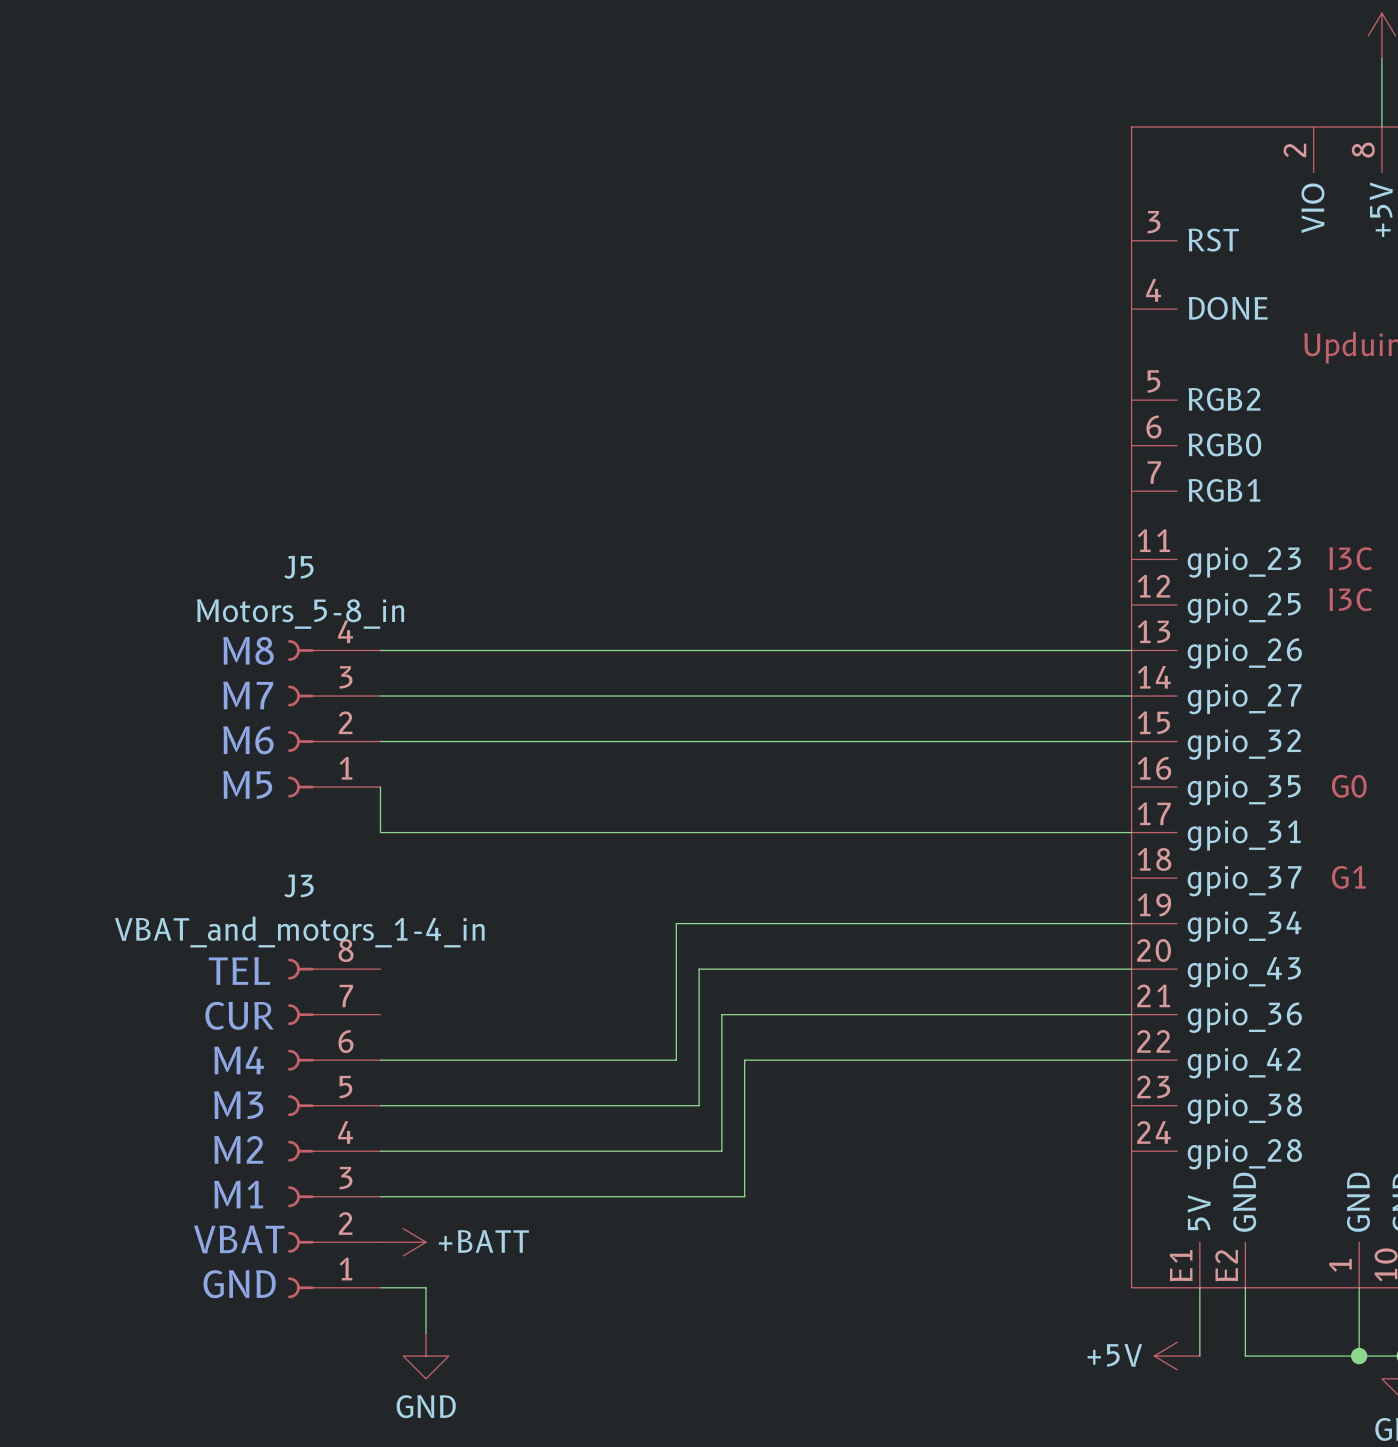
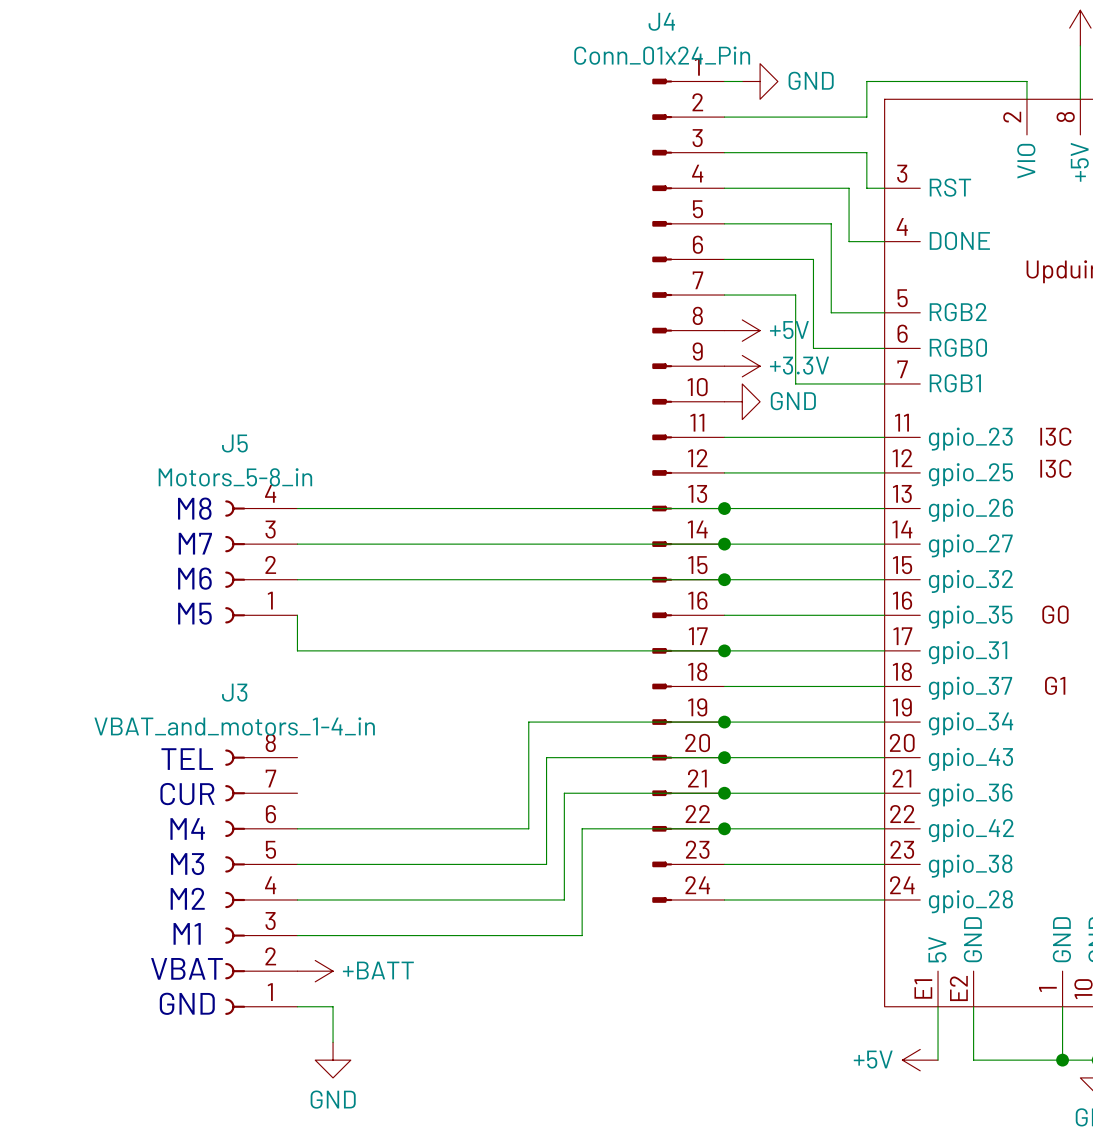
wire: none -> (724, 81) (742, 81)
power symbol: none -> GND (760, 81)
wire: none -> (1026, 99) (1026, 81) (866, 81) (866, 117) (724, 117)
wire: none -> (724, 152) (866, 152) (866, 188) (884, 188)
wire: none -> (724, 188) (849, 188) (849, 241) (884, 241)
wire: none -> (724, 223) (831, 223) (831, 312) (884, 312)
wire: none -> (724, 259) (813, 259) (813, 348) (884, 348)
wire: none -> (724, 295) (795, 295) (795, 383) (884, 383)
power symbol: none -> +5V (742, 330)
power symbol: none -> +3.3V (742, 366)
power symbol: none -> GND (742, 401)
wire: none -> (724, 437) (884, 437)
wire: none -> (724, 472) (884, 472)
J4: none -> Conn_01x24_Pin (688, 490)
junction: none -> (724, 508)
junction: none -> (724, 544)
junction: none -> (724, 579)
wire: none -> (724, 615) (884, 615)
junction: none -> (724, 650)
wire: none -> (724, 686) (884, 686)
junction: none -> (724, 722)
junction: none -> (724, 757)
junction: none -> (724, 793)
junction: none -> (724, 828)
wire: none -> (724, 864) (884, 864)
wire: none -> (724, 899) (884, 899)

